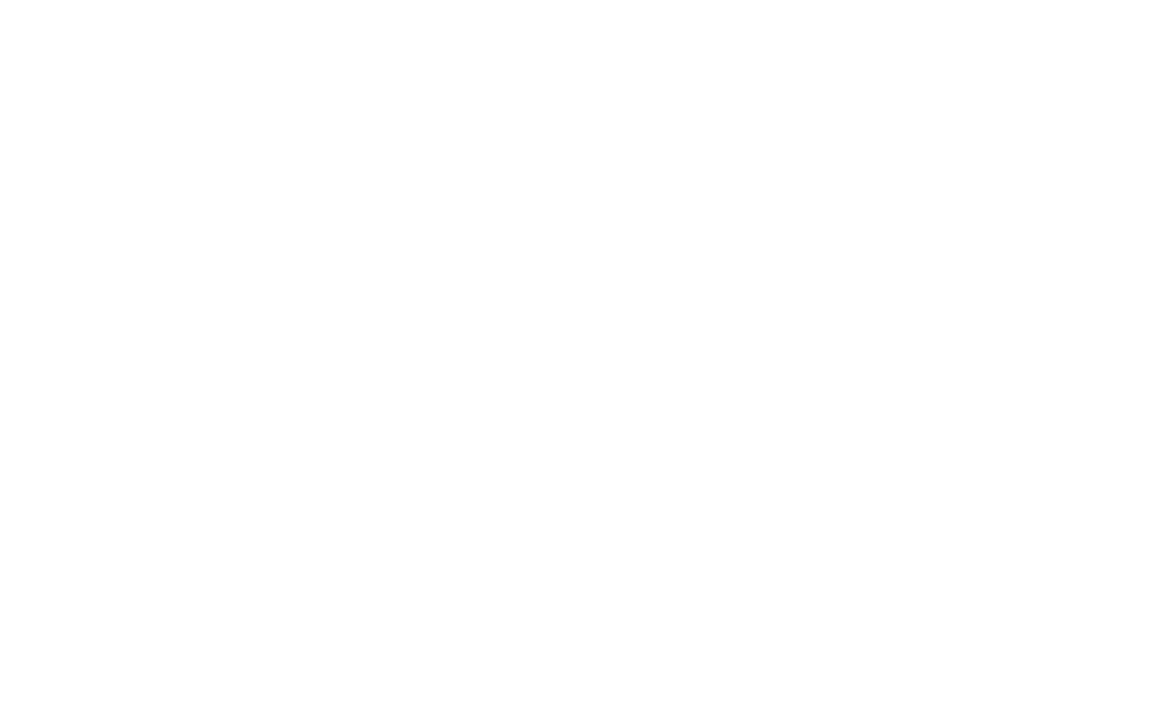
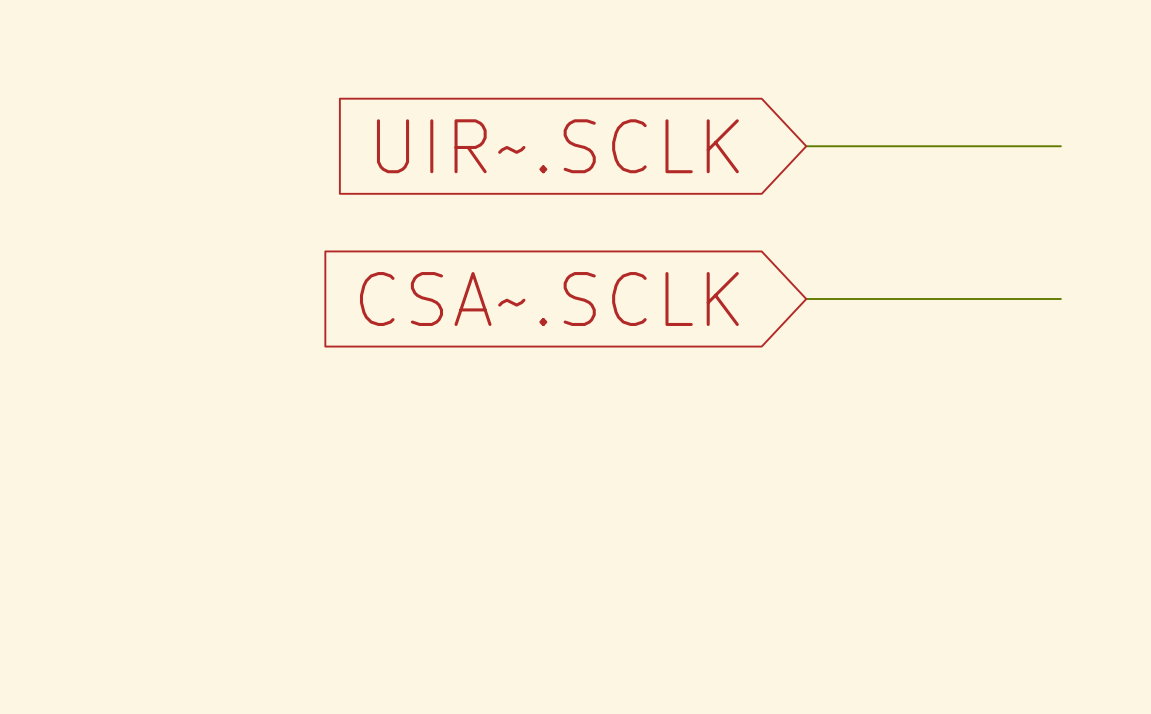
global label: none -> UIR~.SCLK (557, 146)
wire: none -> (806, 146) (1060, 146)
global label: none -> CSA~.SCLK (549, 299)
wire: none -> (806, 299) (1060, 299)

